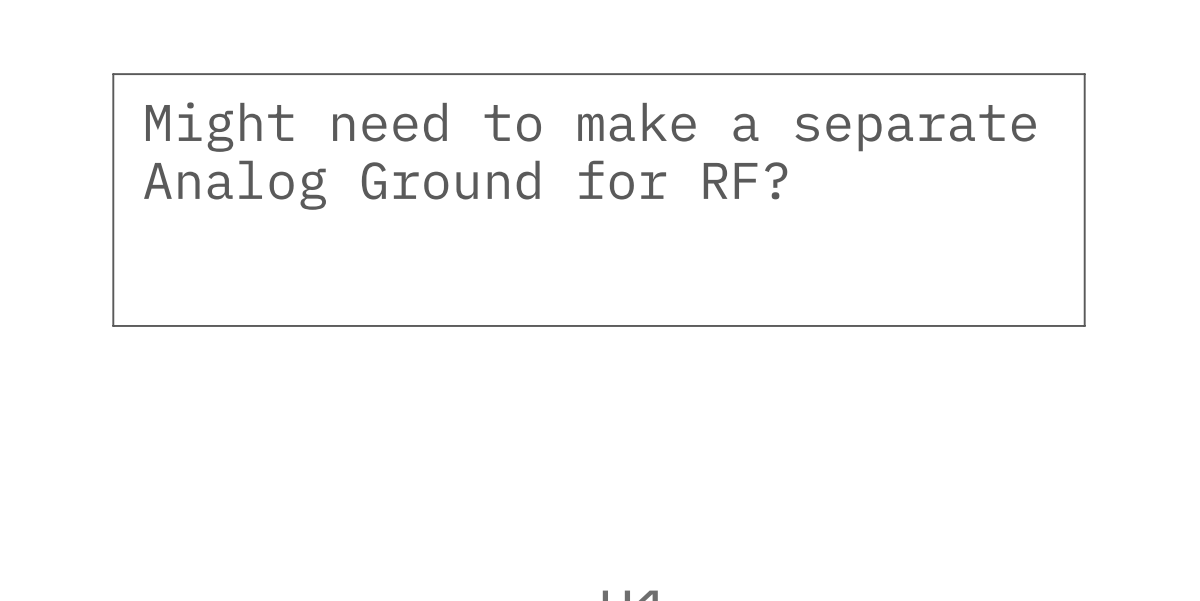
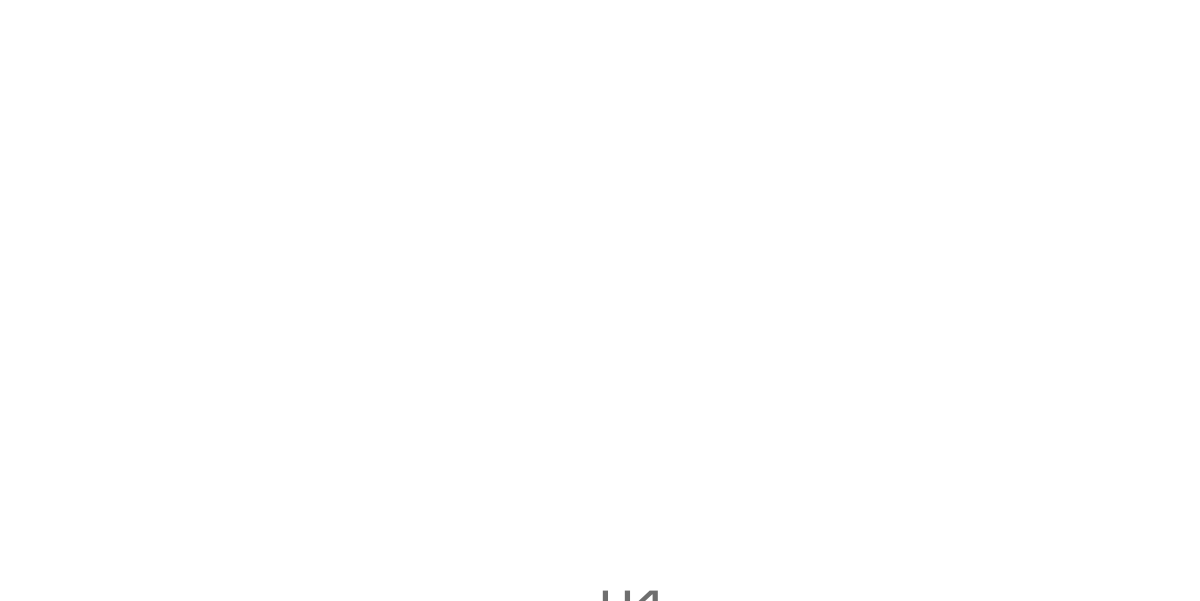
line: (113, 74) (1084, 74) (1084, 325) (113, 325) (113, 74) -> none
text: Might need to make a separate (590, 127) -> none
text: Analog Ground for RF? (465, 185) -> none

